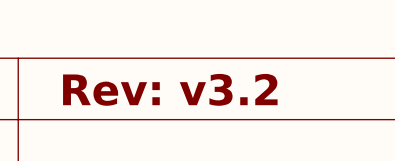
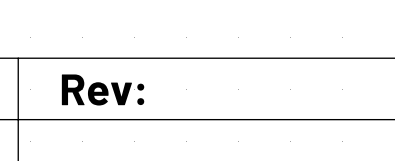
title block: Rev: v3.2 (170, 89) -> Rev: (103, 90)

